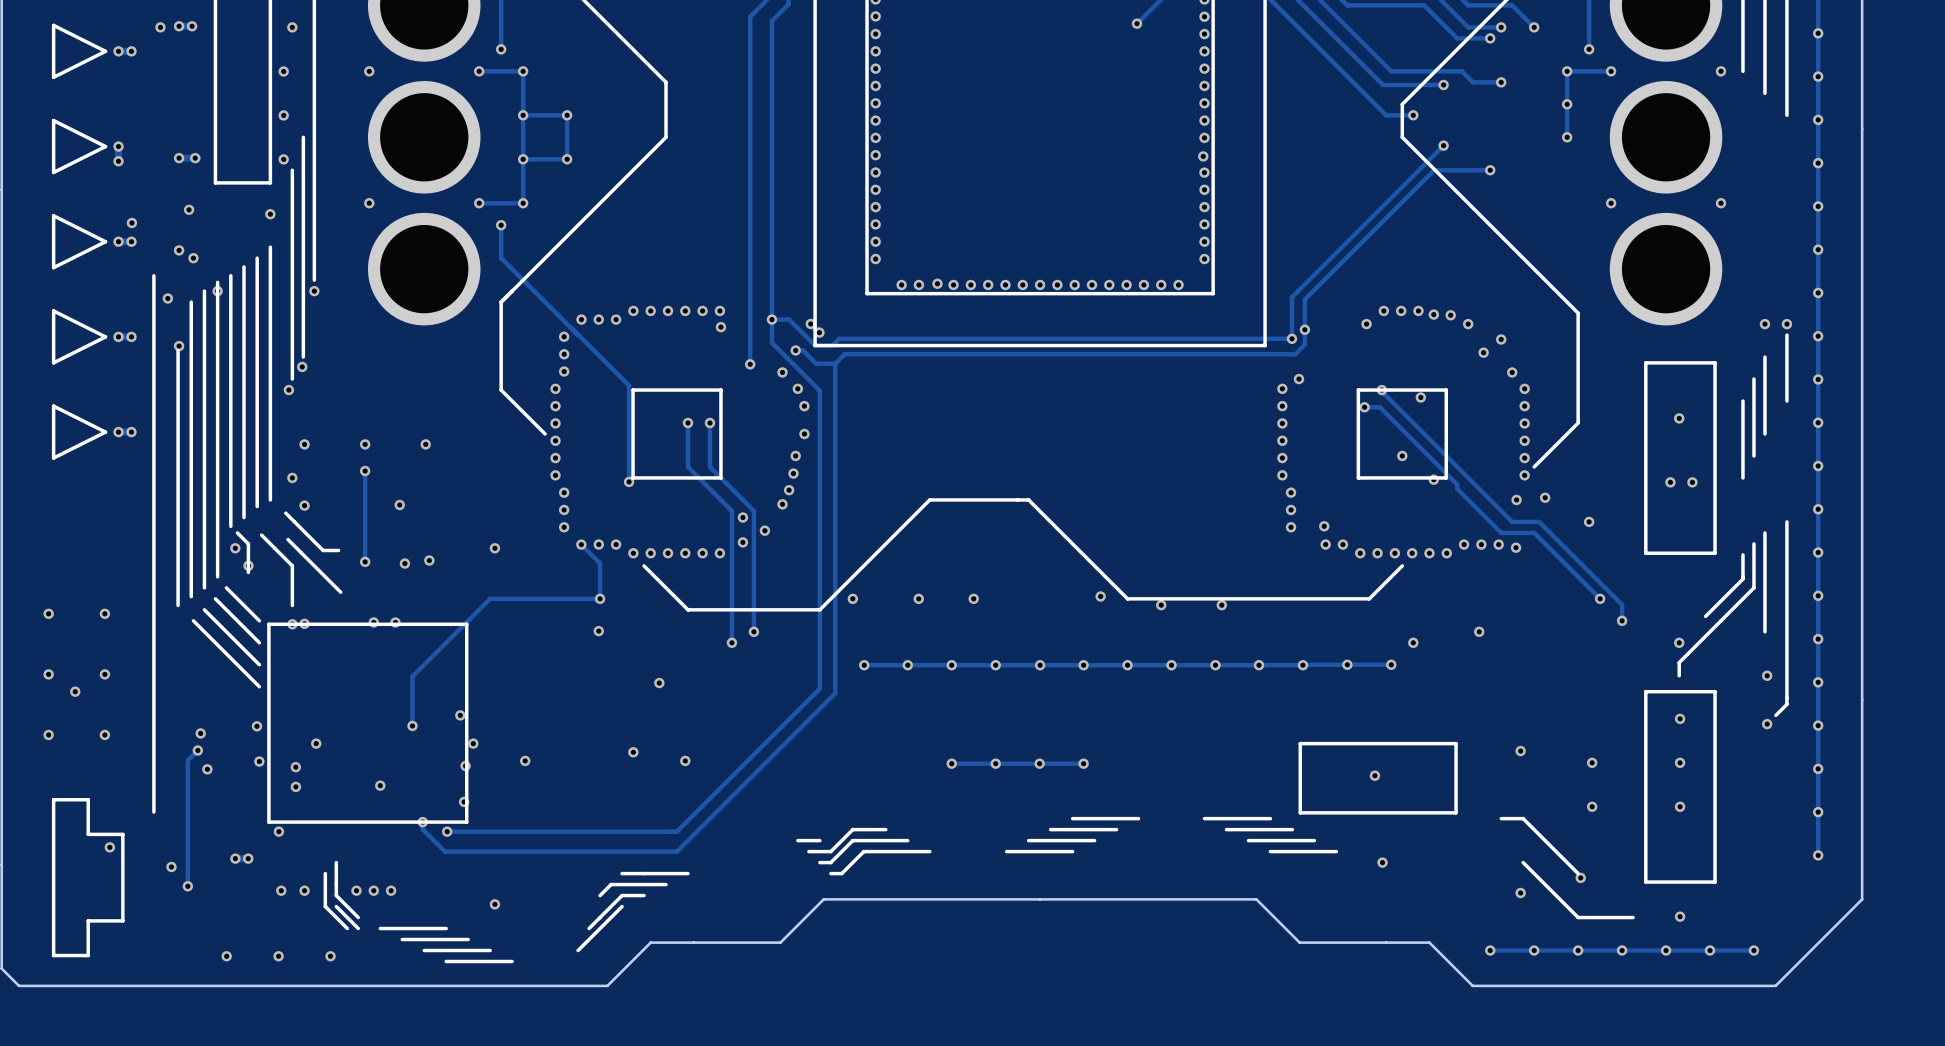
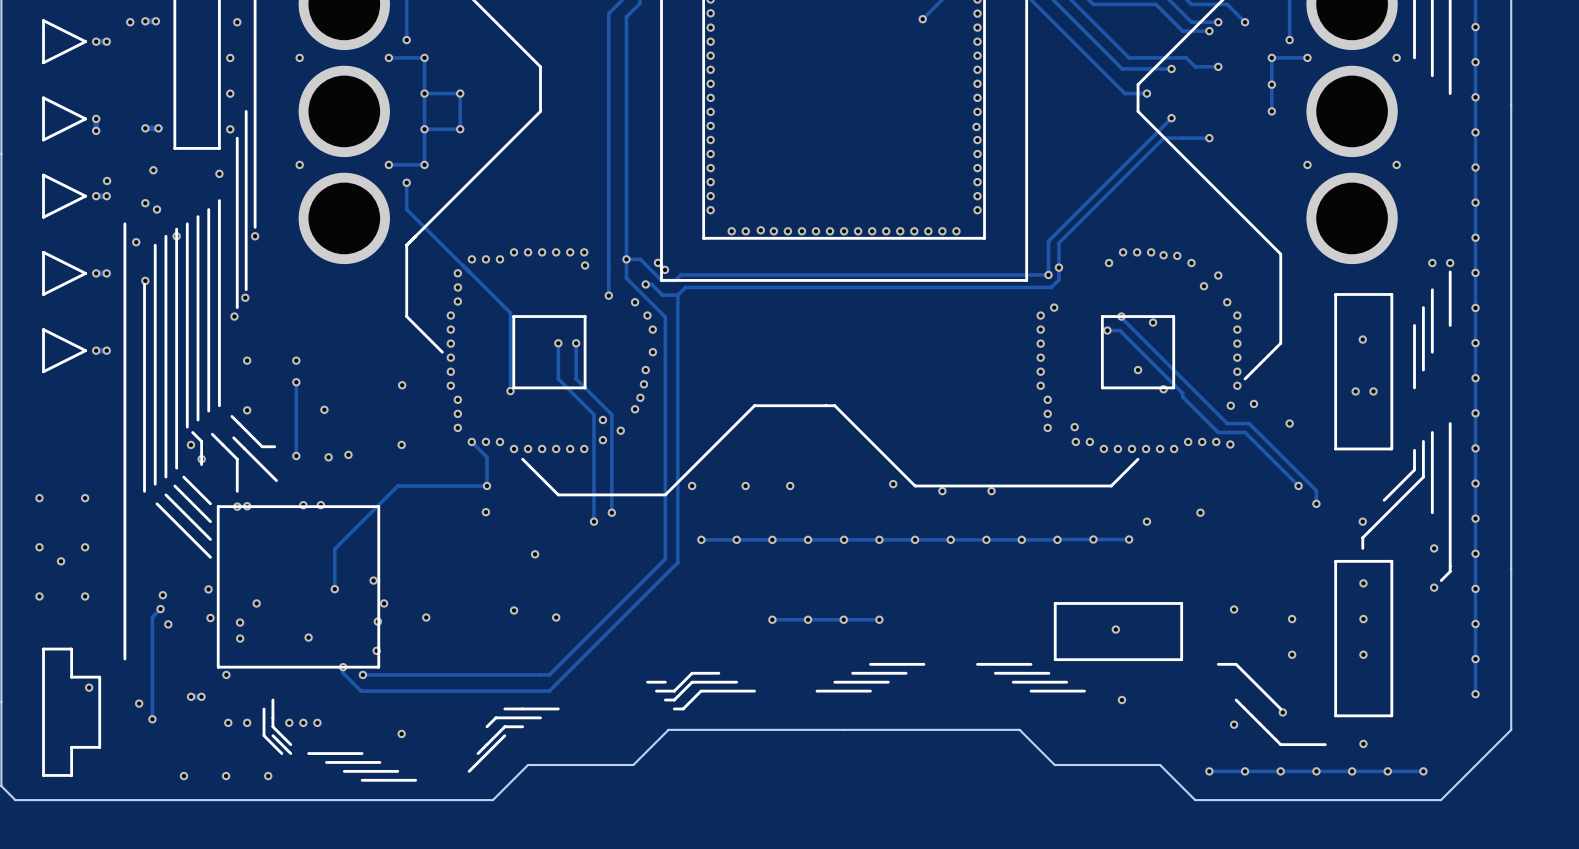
via position: (425, 444) -> (402, 385)
via: (292, 477) -> none

